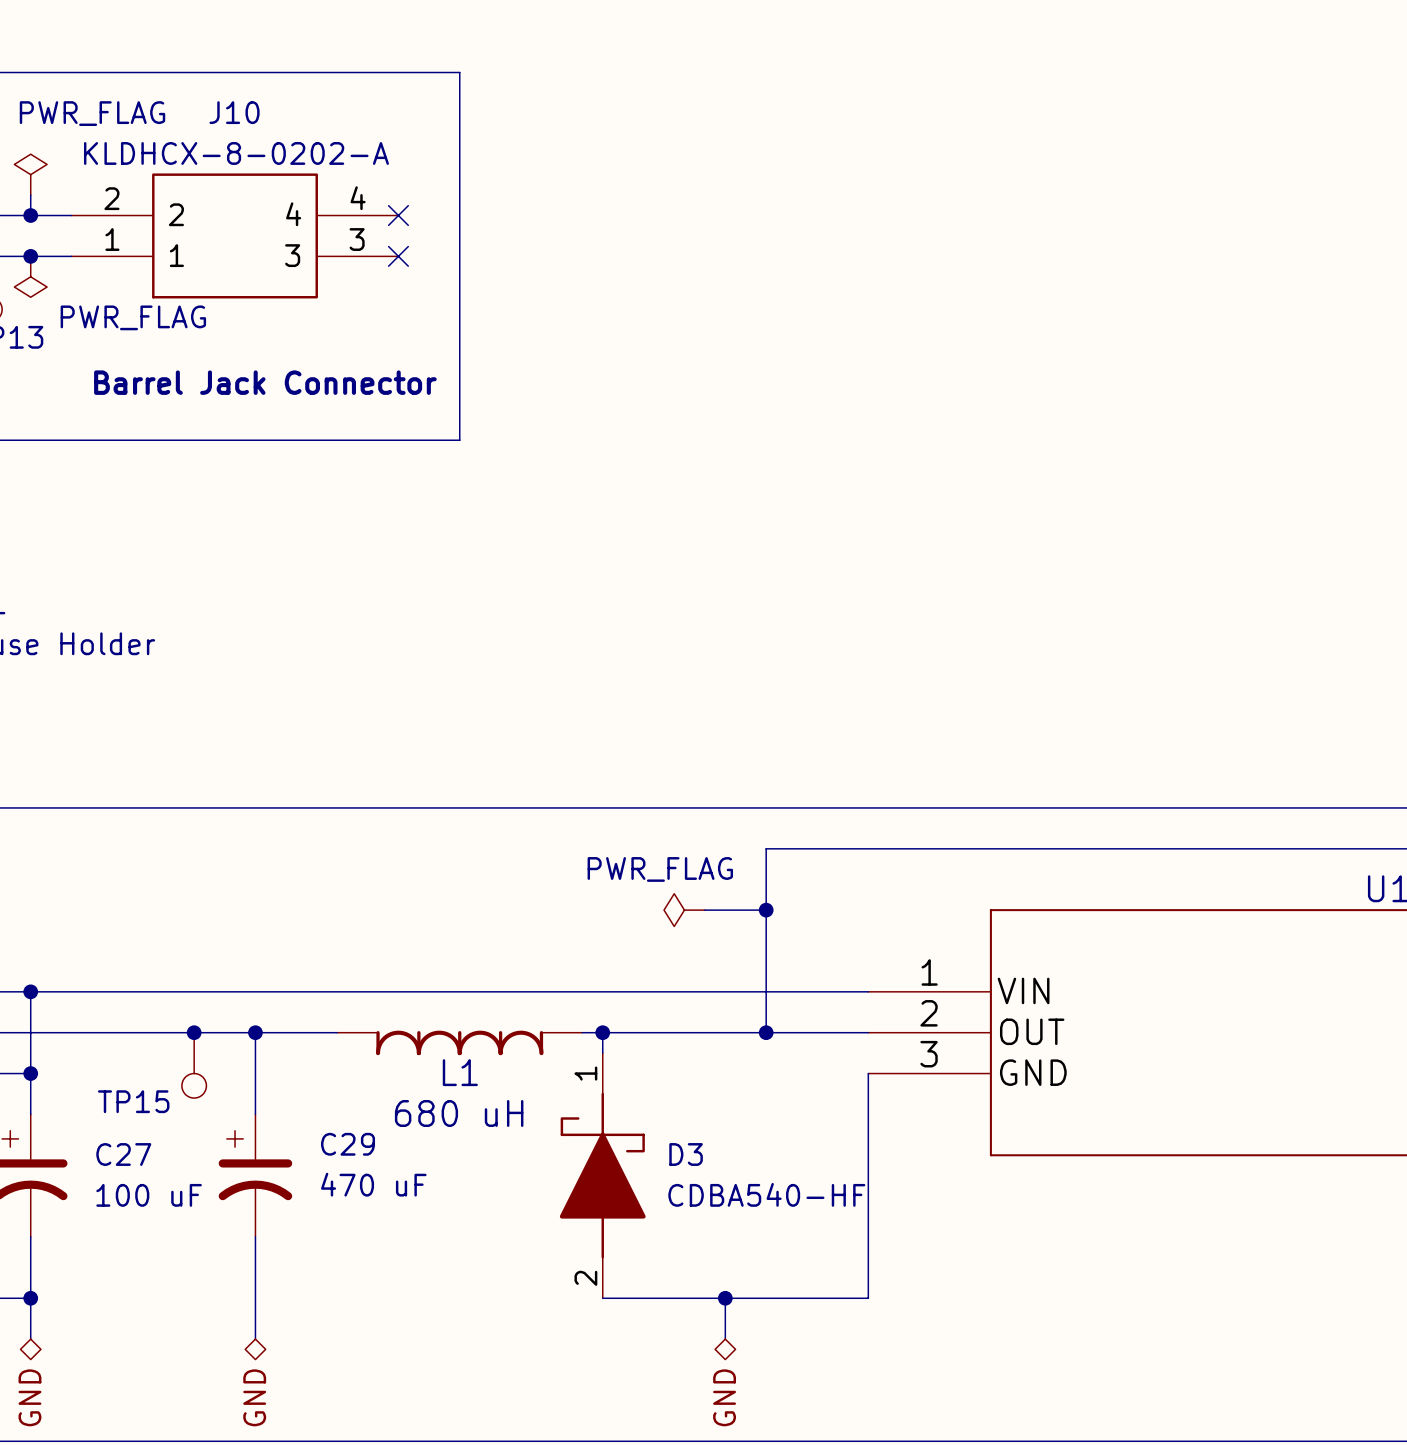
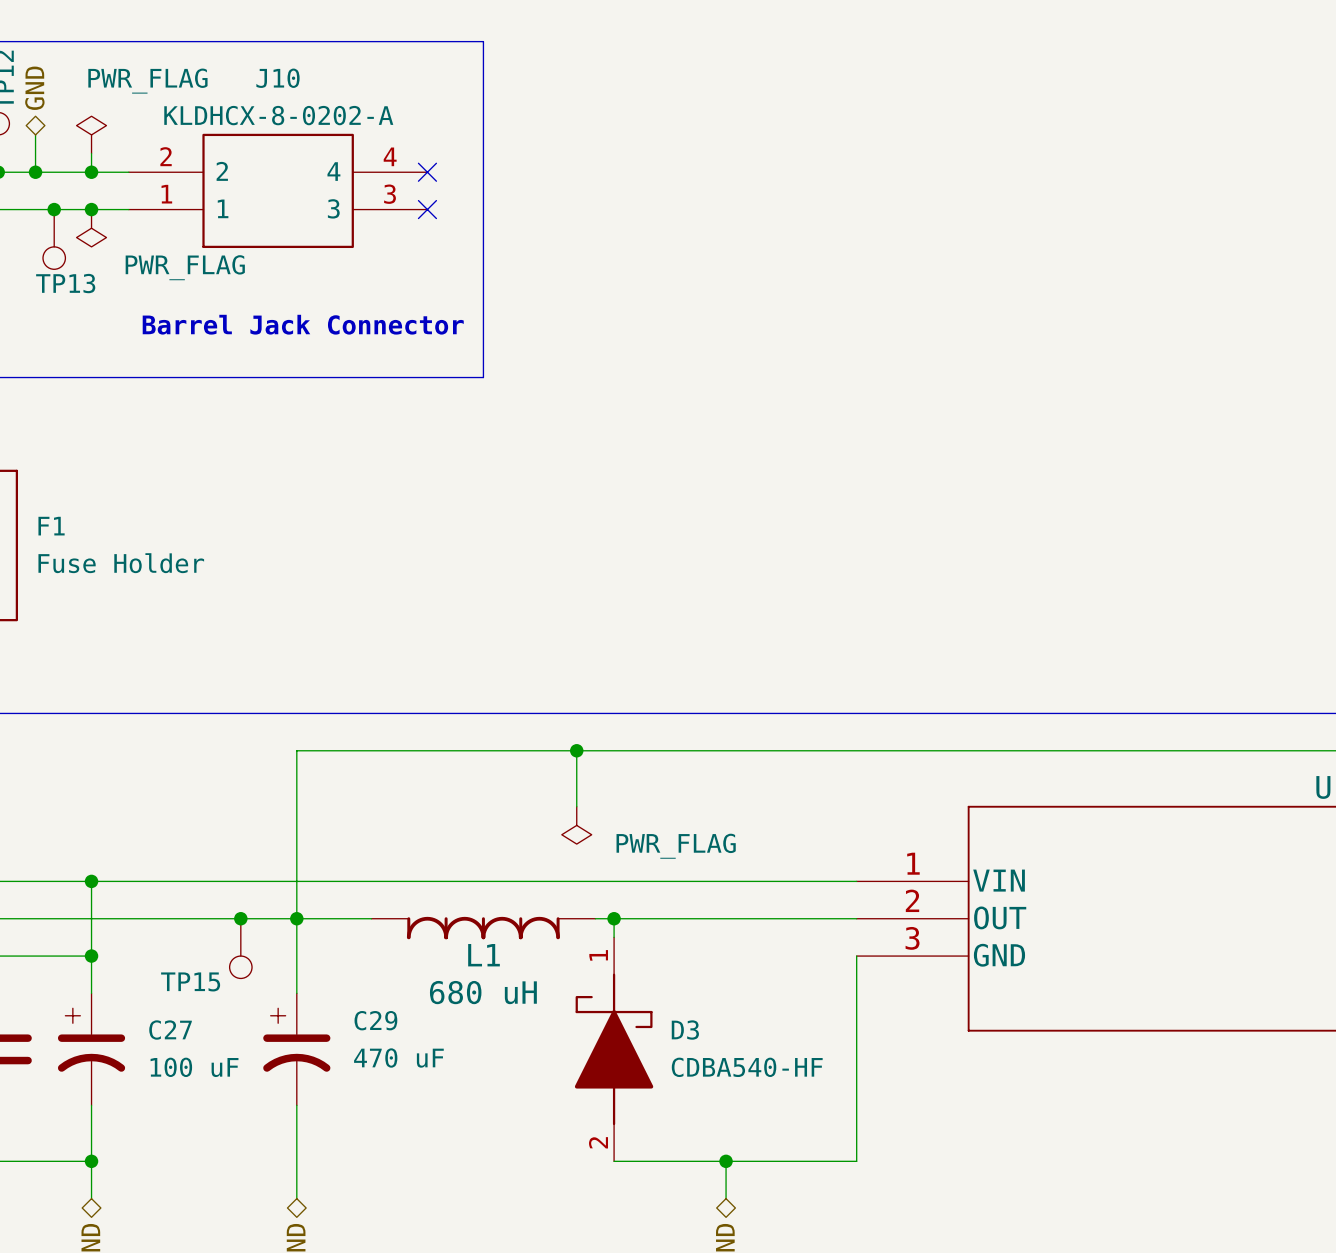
wire: none -> (576, 750) (576, 806)
junction: none -> (576, 750)
wire: (766, 848) (766, 1032) -> (763, 750) (296, 750) (296, 918)
power symbol text position: PWR_FLAG (660, 869) -> PWR_FLAG (676, 846)
power symbol rotation: 0° (684, 910) -> 90° counterclockwise (576, 825)
power symbol position: PWR_FLAG (684, 910) -> PWR_FLAG (576, 825)
wire: (704, 910) (766, 910) -> none
junction: (766, 910) -> none
junction: (766, 1032) -> none

